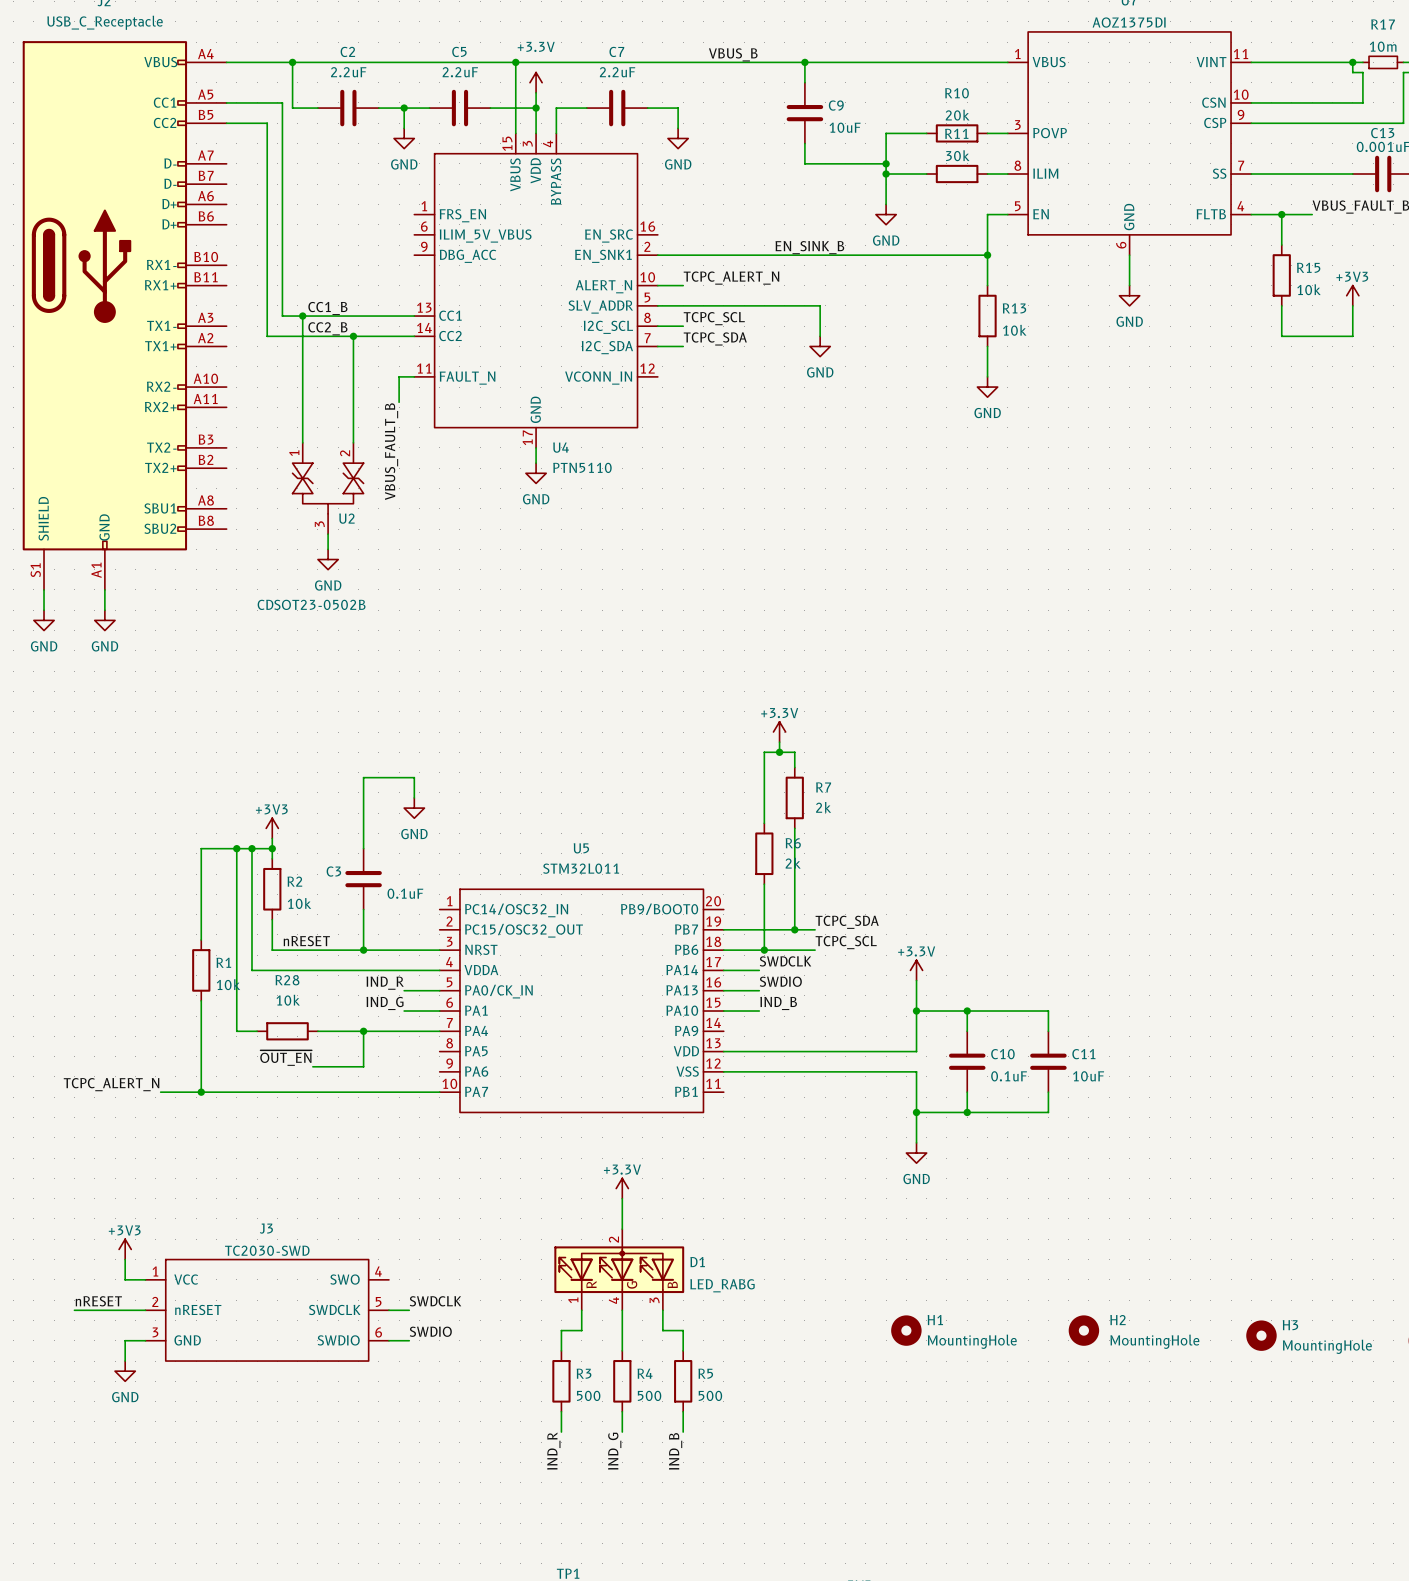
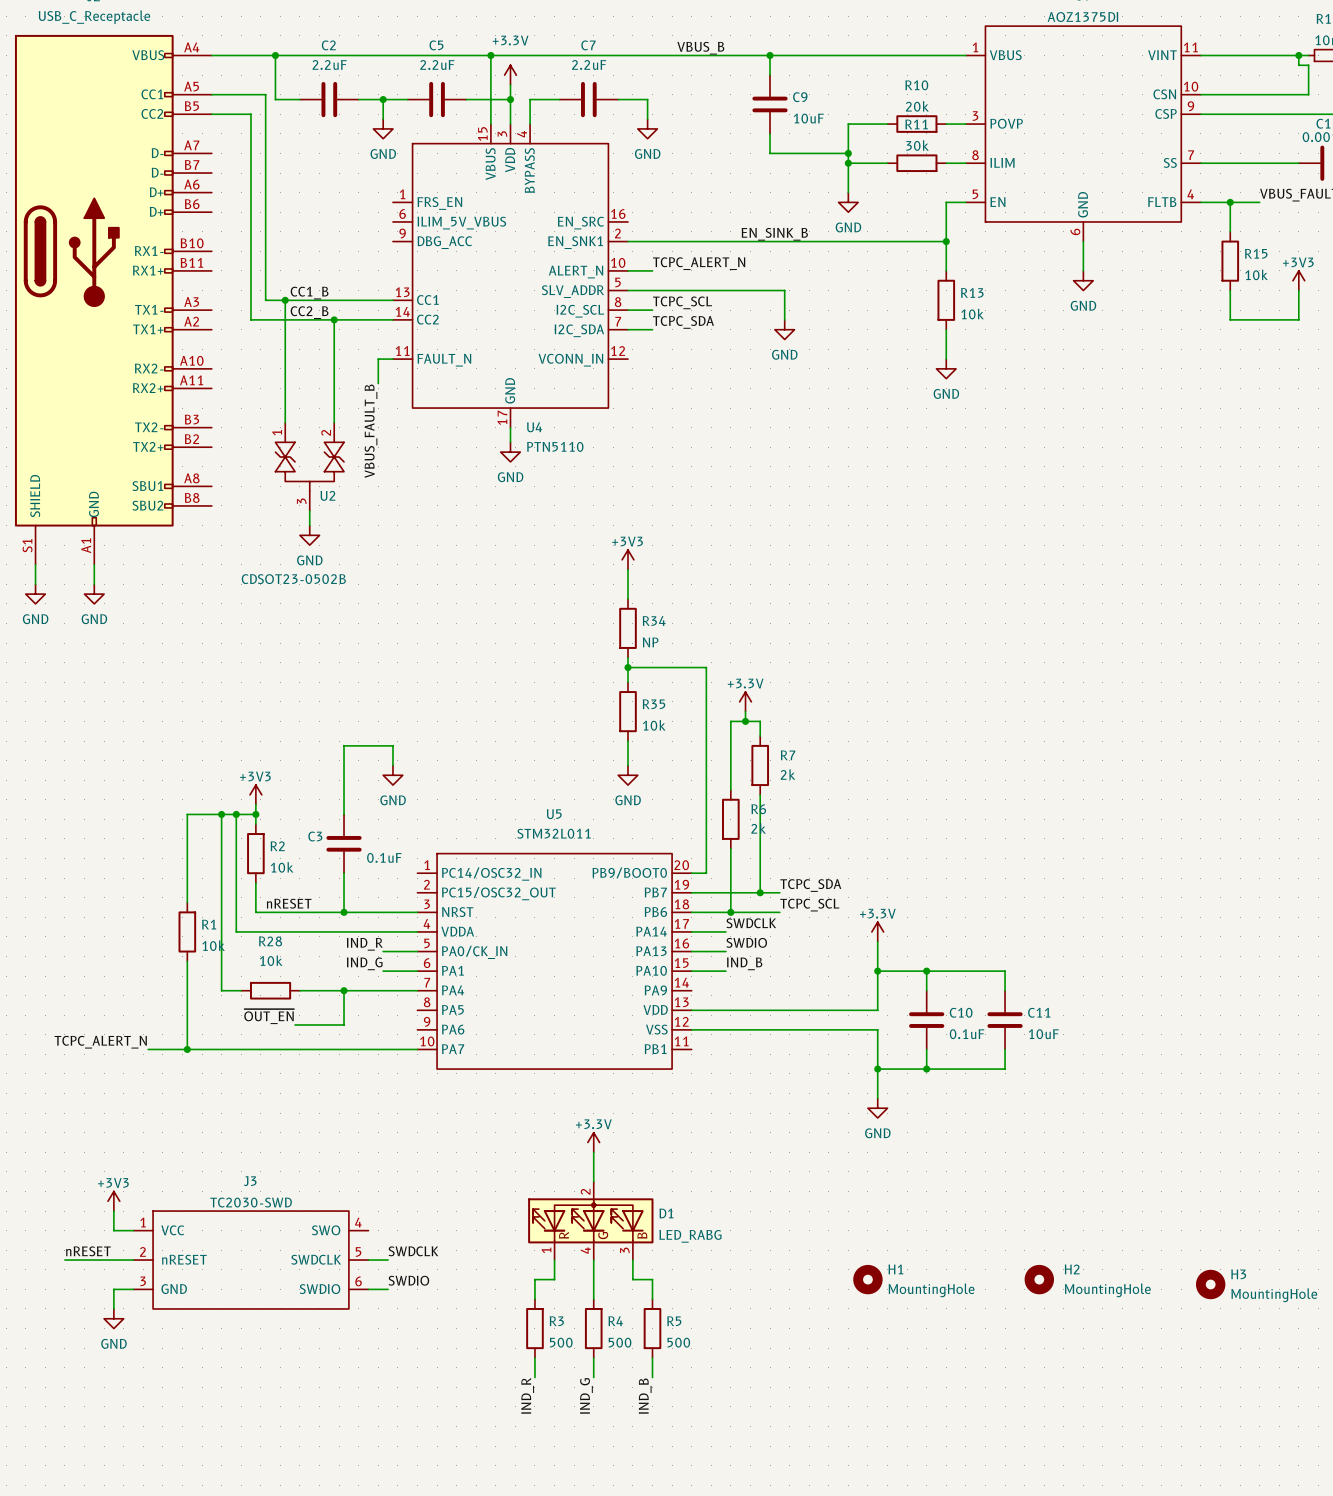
power symbol: none -> +3V3 (628, 559)
wire: none -> (628, 569) (628, 599)
R34: none -> NP (628, 628)
wire: none -> (628, 657) (628, 682)
wire: none -> (628, 667) (706, 667) (706, 873) (691, 873)
junction: none -> (628, 667)
R35: none -> 10k (628, 711)
wire: none -> (628, 741) (628, 765)
power symbol: none -> GND (628, 775)

